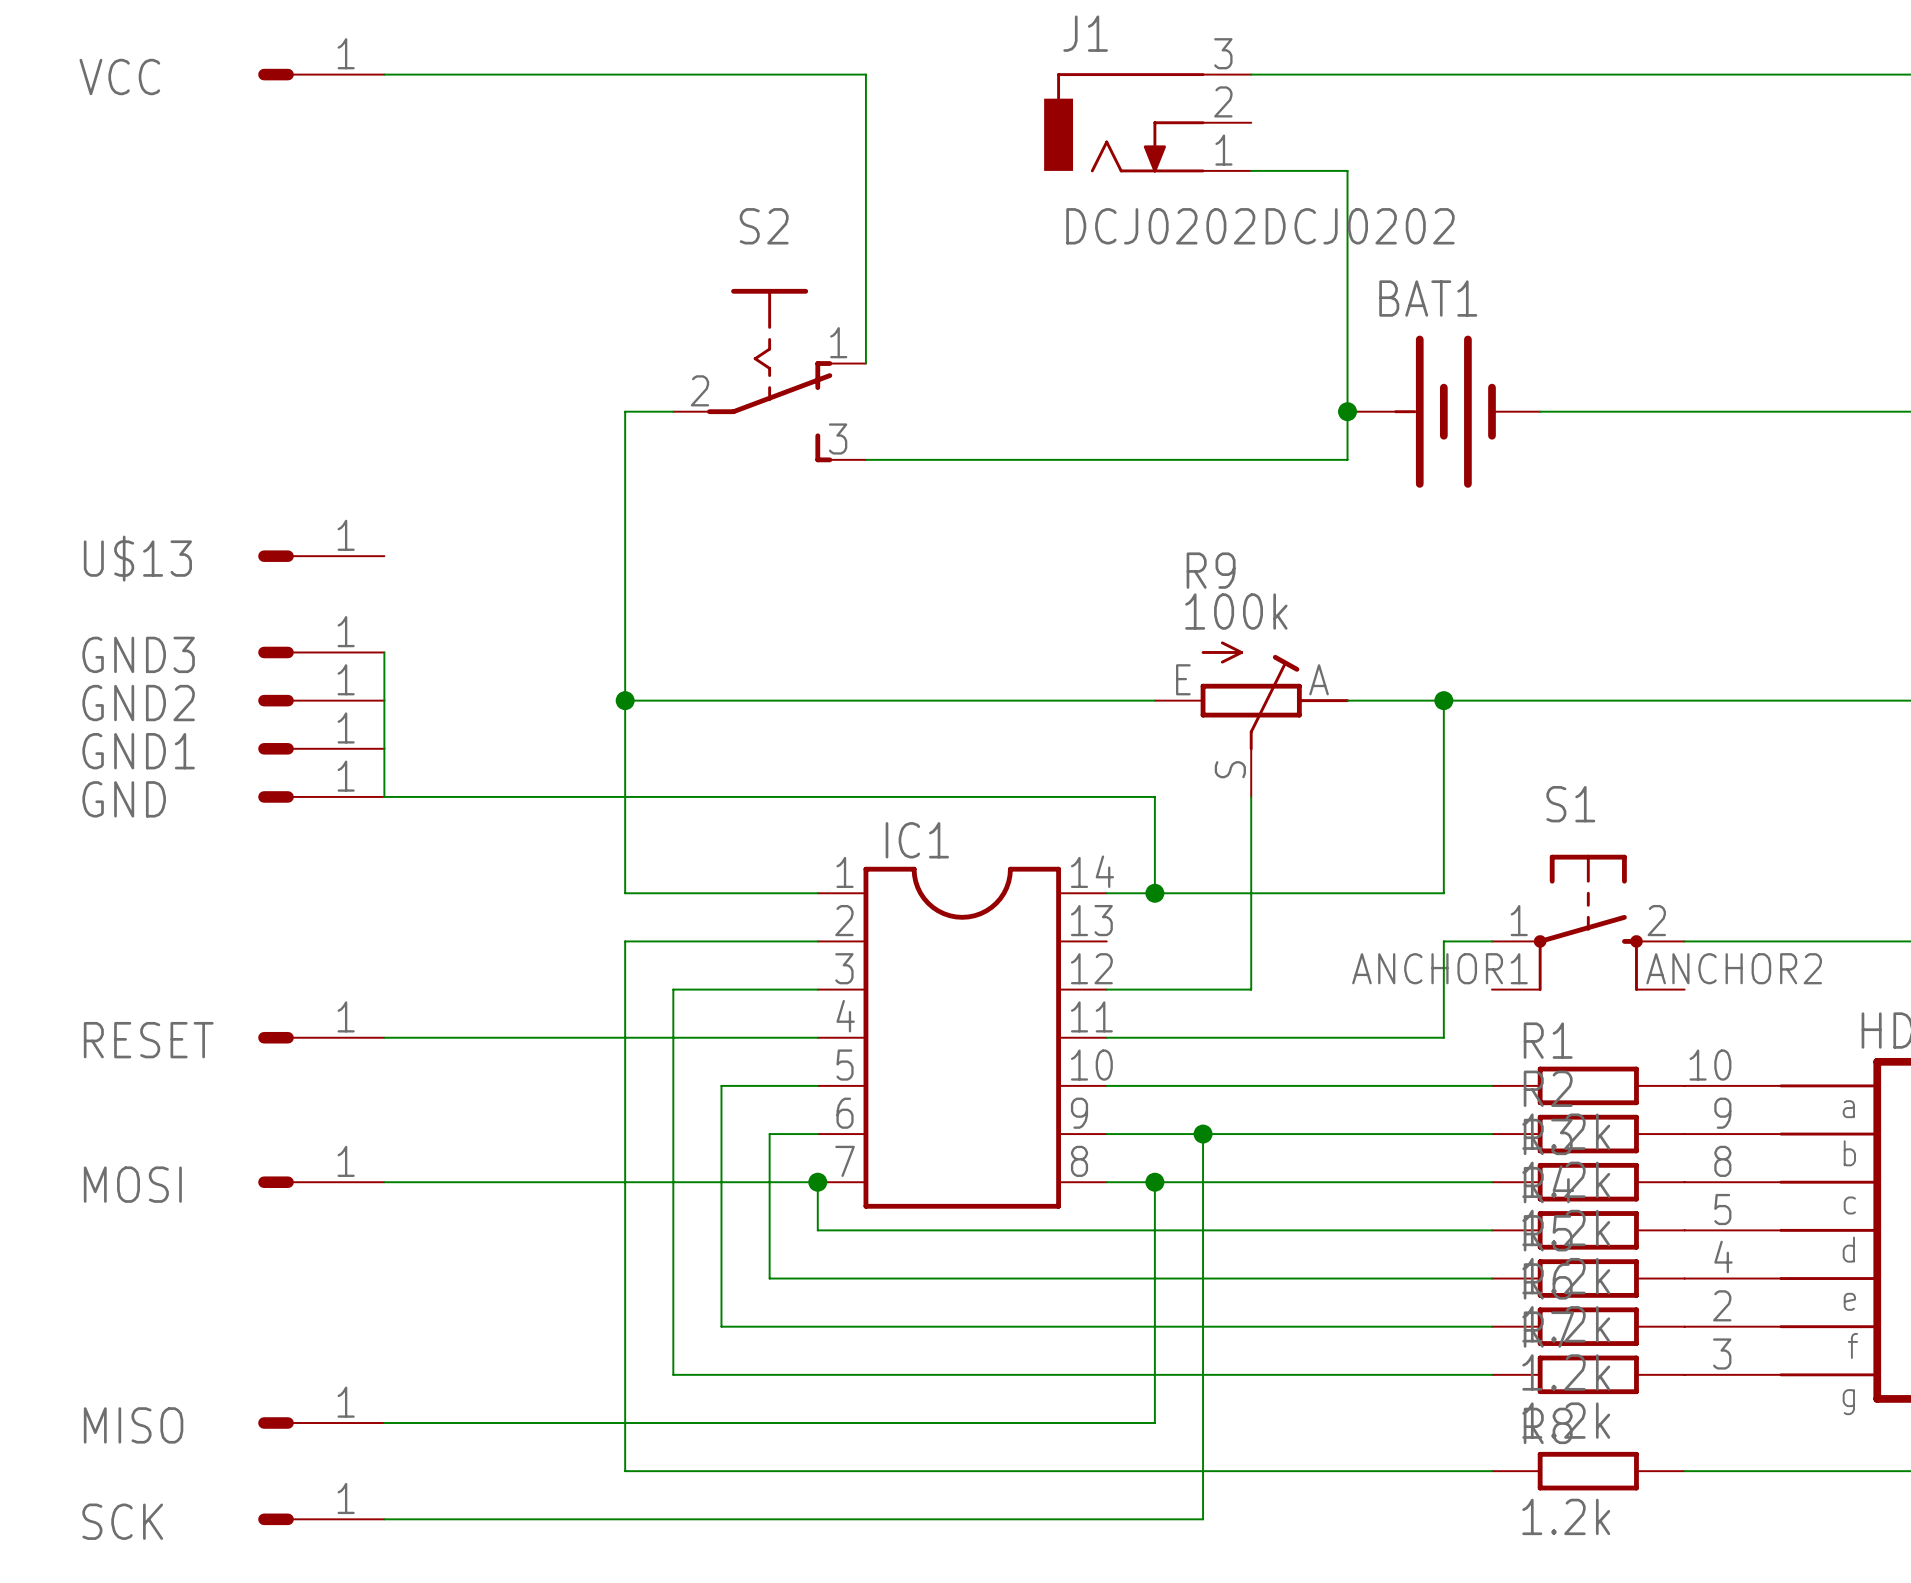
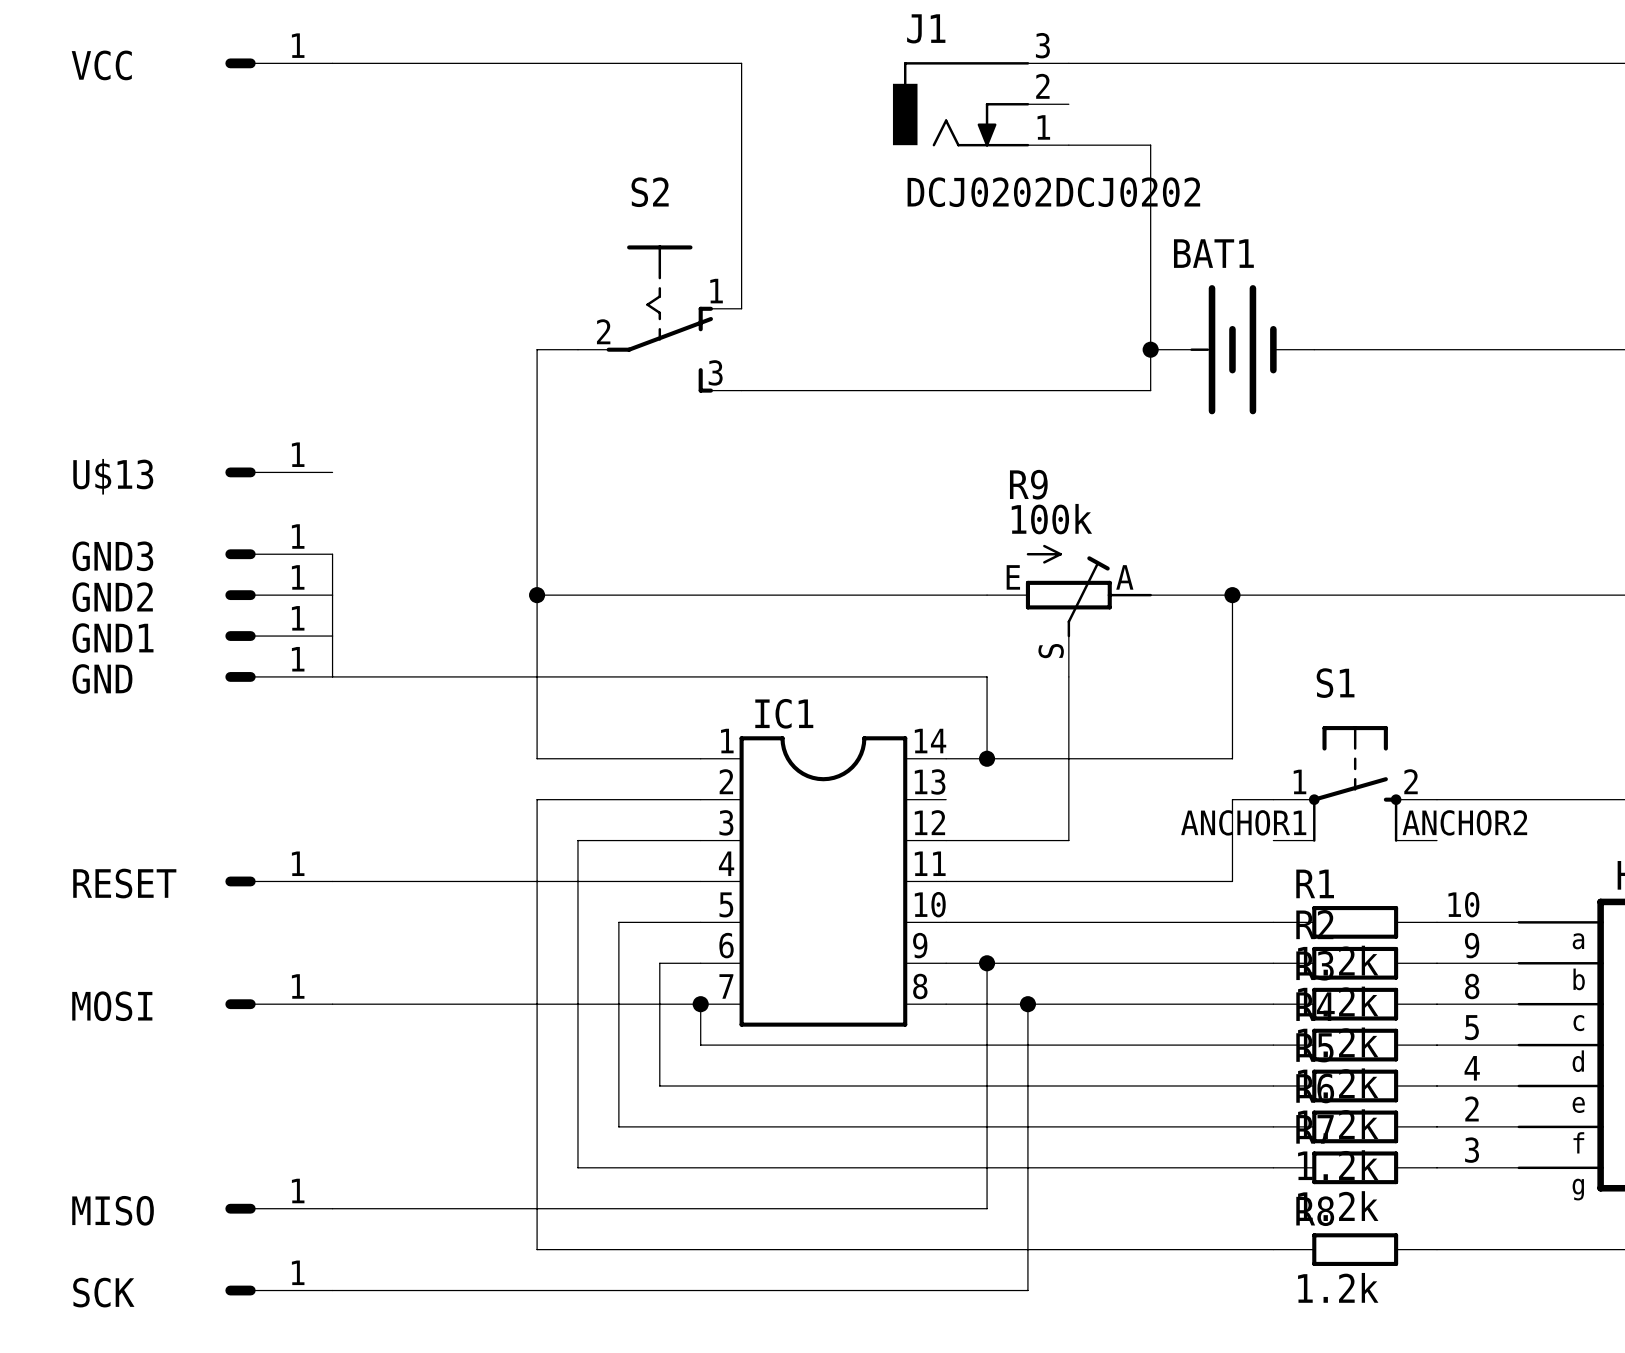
junction: none -> (987, 963)
wire: (1203, 1134) (1203, 1182) -> (987, 963) (987, 1004)
junction: (1203, 1134) -> none
junction: (1154, 1182) -> none
junction: none -> (1027, 1004)

